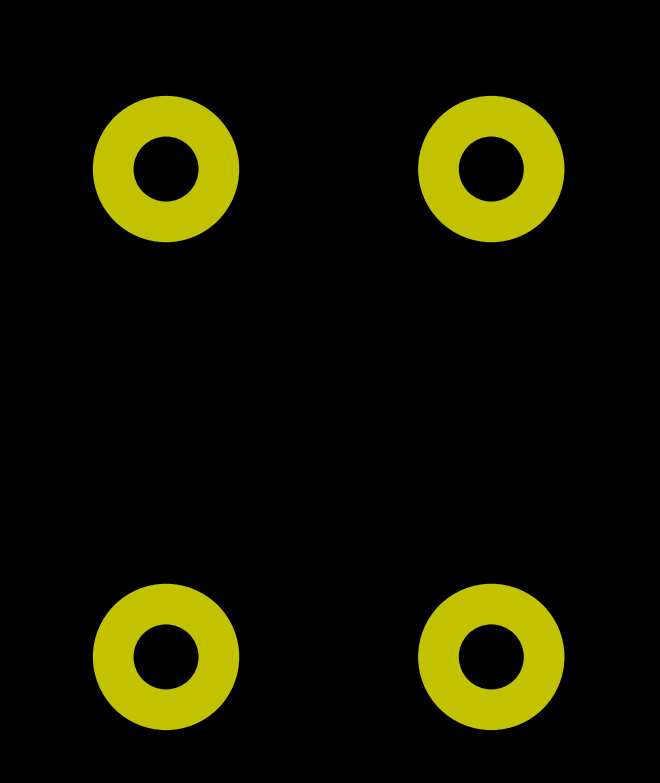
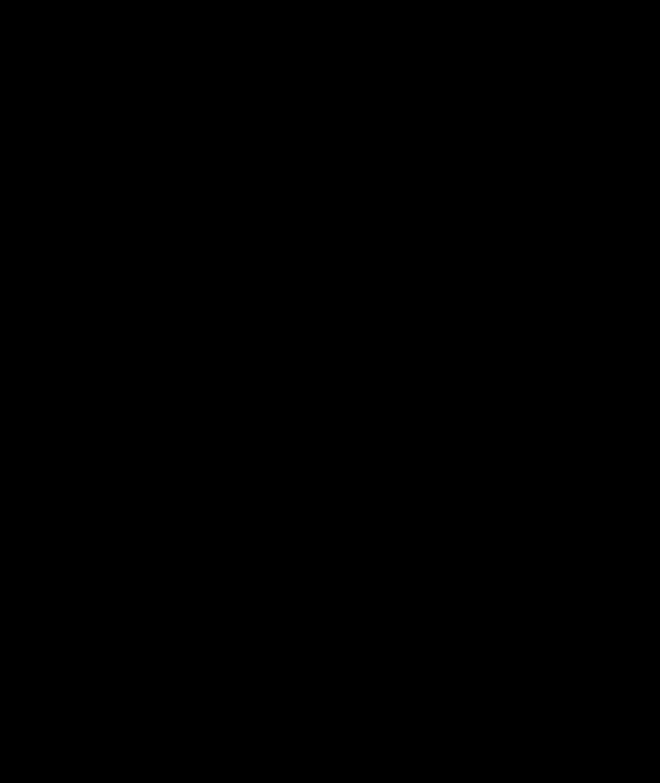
part: (166, 169) -> none
part: (491, 169) -> none
part: (166, 656) -> none
part: (491, 656) -> none

